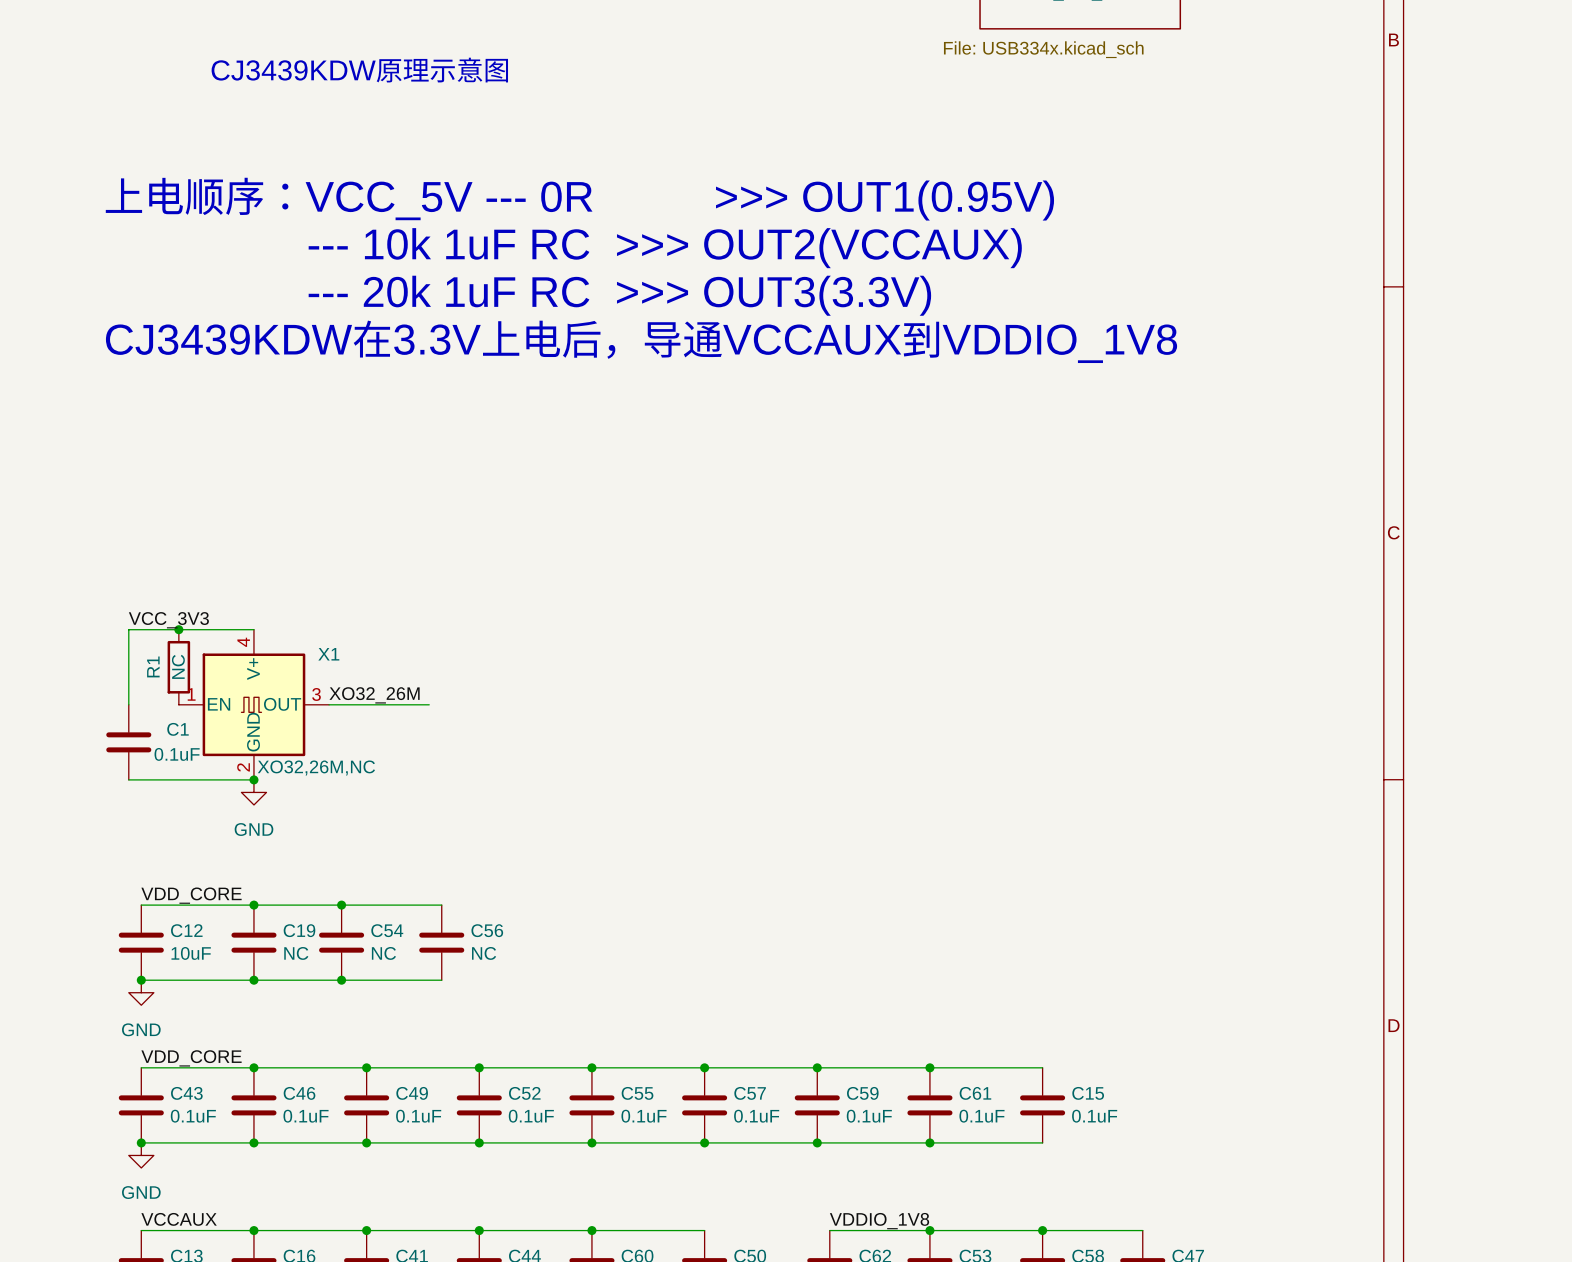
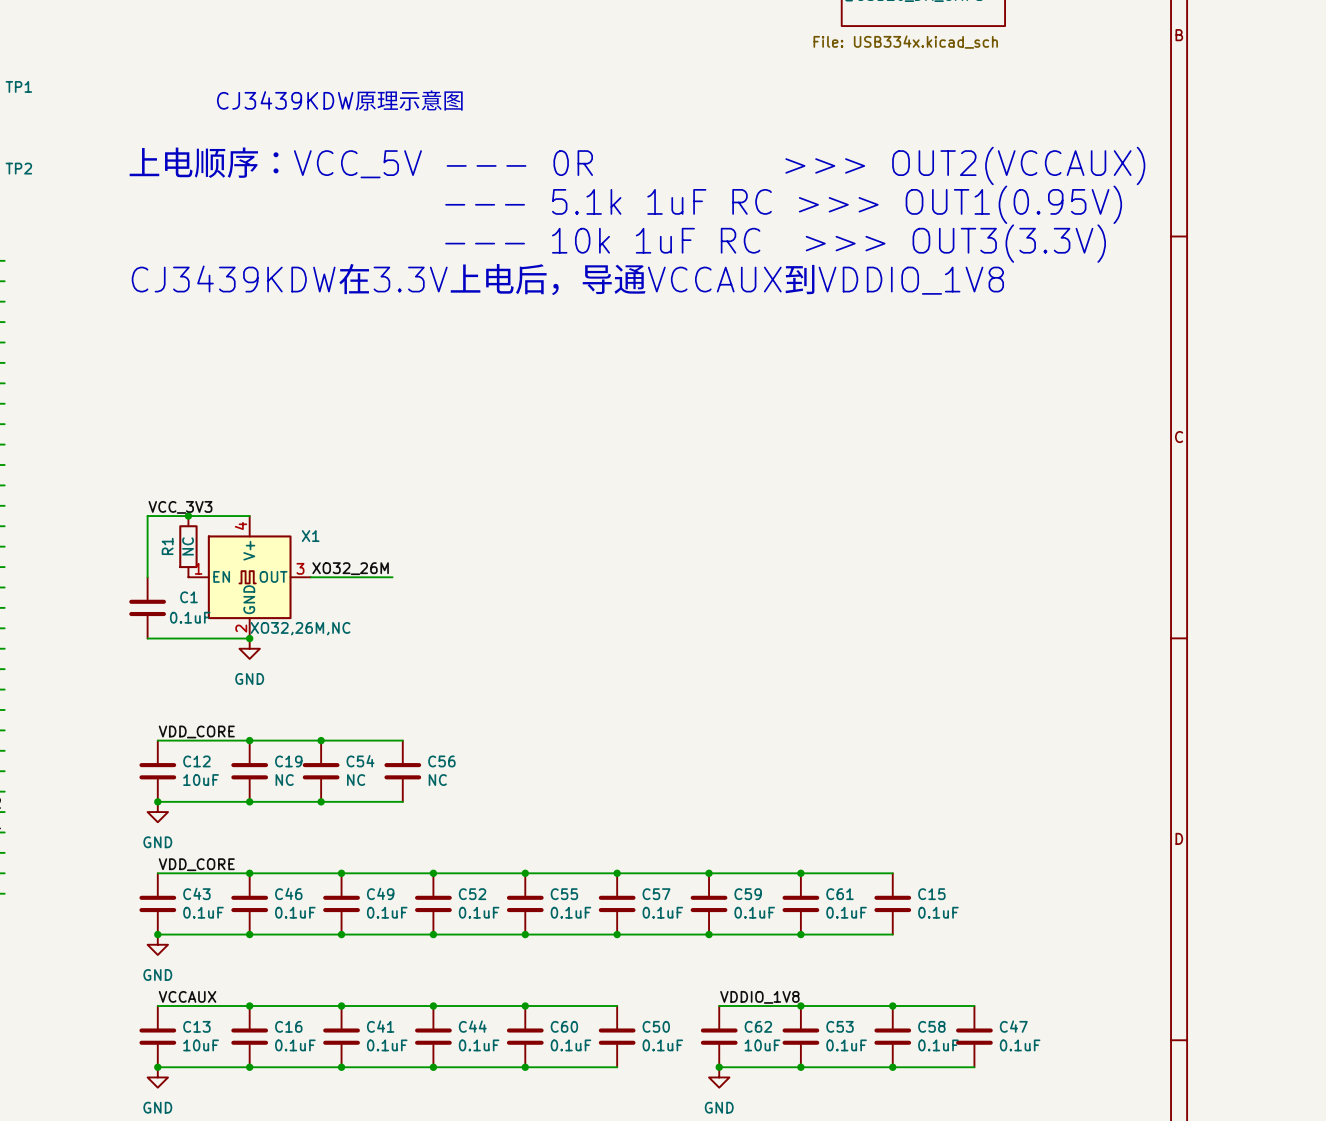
text position: CJ3439KDW原理示意图 (359, 70) -> CJ3439KDW原理示意图 (340, 100)
text: 上电顺序：VCC_5V --- 0R >>> OUT1(0.95V) (579, 199) -> 上电顺序：VCC_5V --- 0R >>> OUT2(VCCAUX) (637, 165)
text: --- 10k 1uF RC >>> OUT2(VCCAUX) (665, 248) -> --- 5.1k 1uF RC >>> OUT1(0.95V) (783, 204)
text: --- 20k 1uF RC >>> OUT3(3.3V) (619, 295) -> --- 10k 1uF RC >>> OUT3(3.3V) (775, 243)

